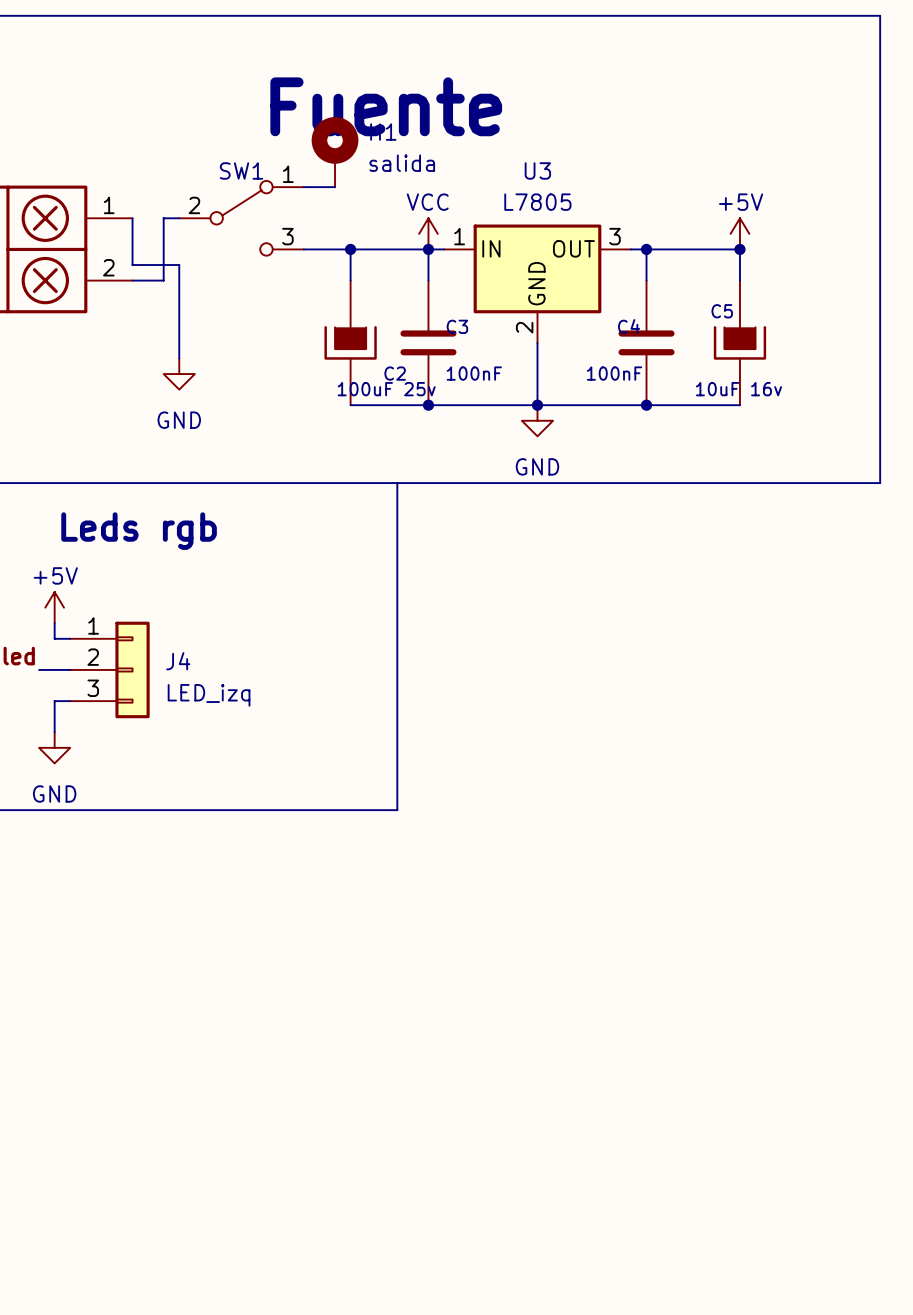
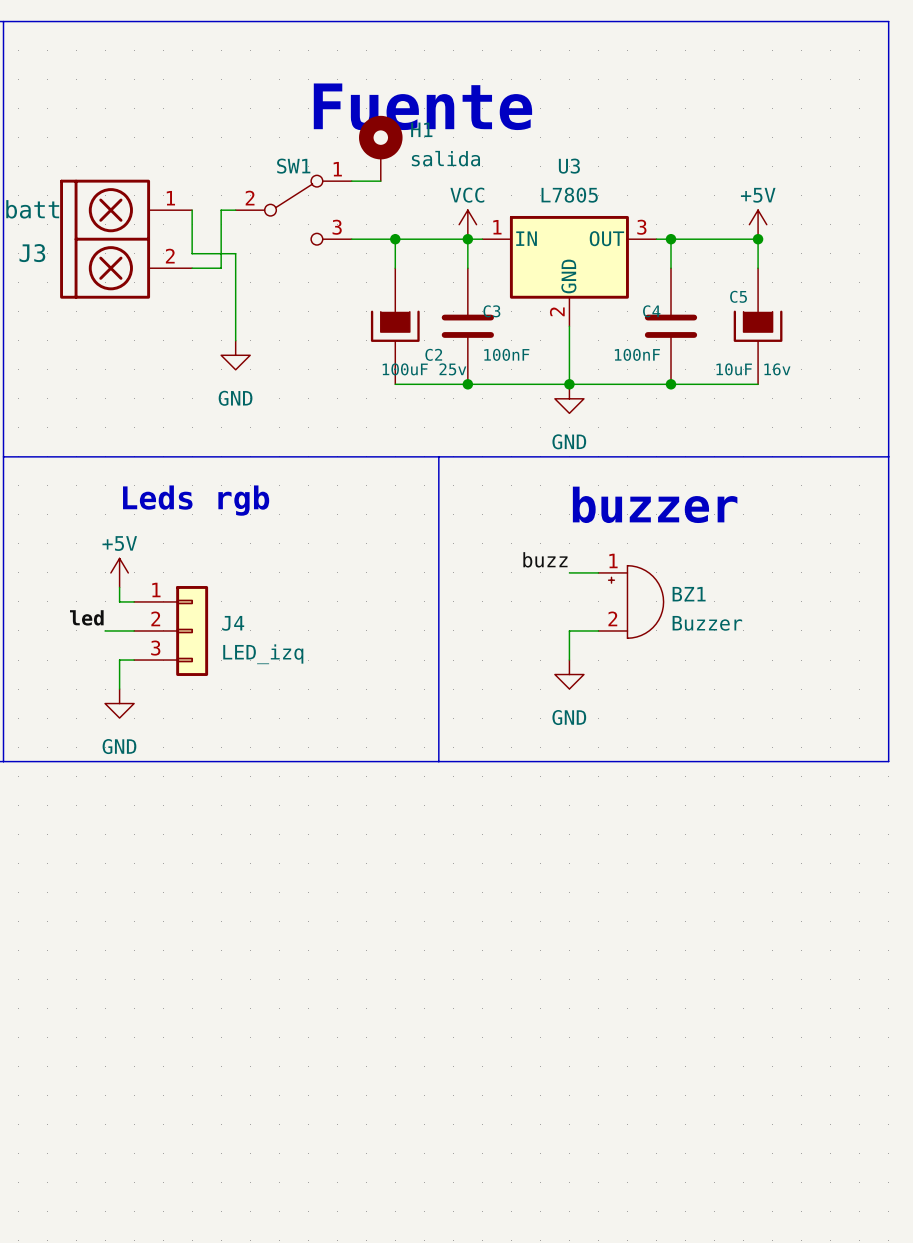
line: none -> (888, 456) (888, 761) (438, 761)
text: none -> buzzer (655, 504)
label: none -> buzz (545, 559)
wire: none -> (569, 572) (598, 572)
BZ1: none -> Buzzer (631, 601)
wire: none -> (598, 630) (569, 630) (569, 660)
power symbol: none -> GND (569, 674)

